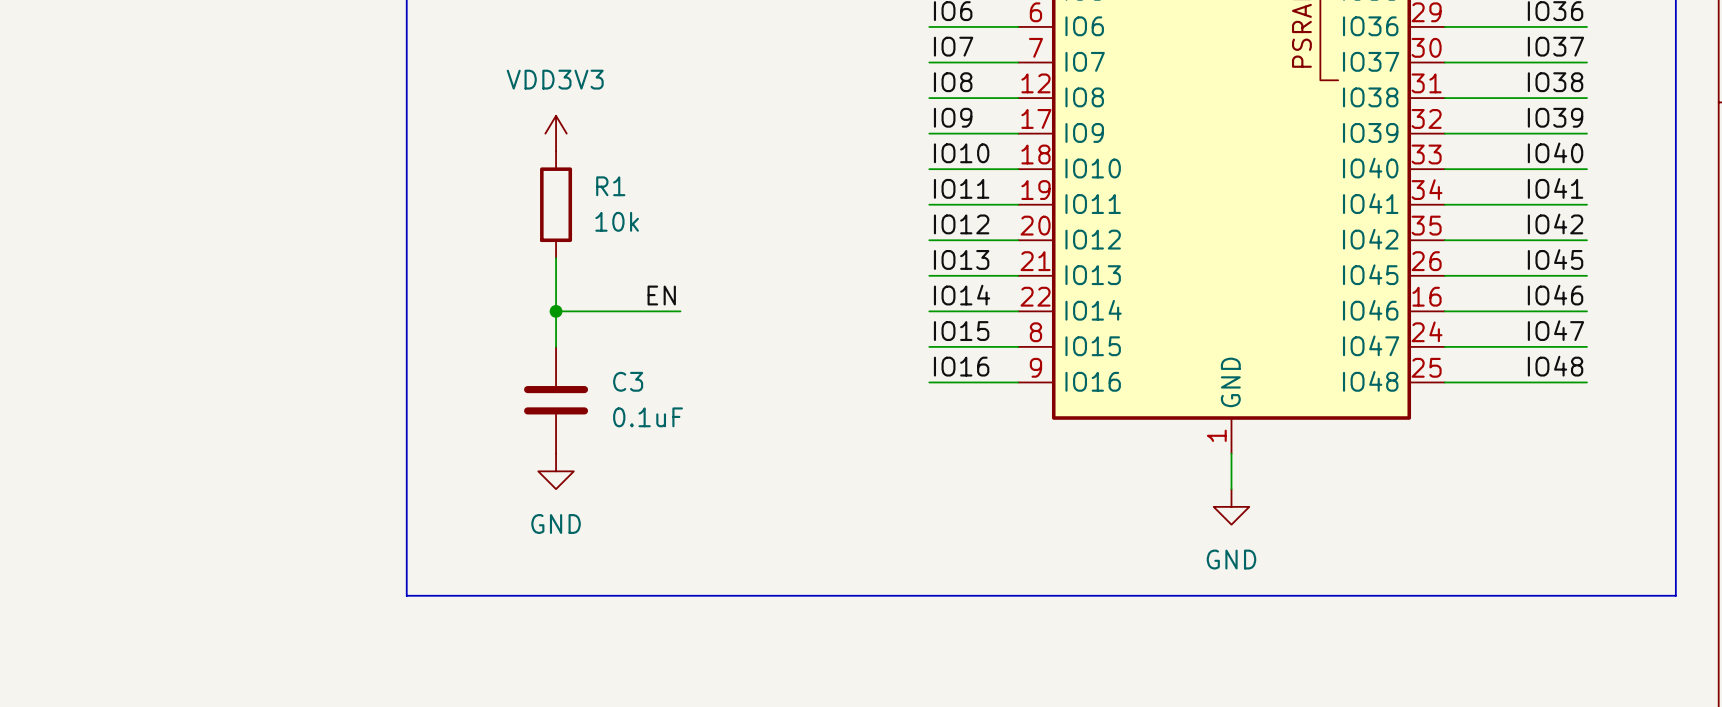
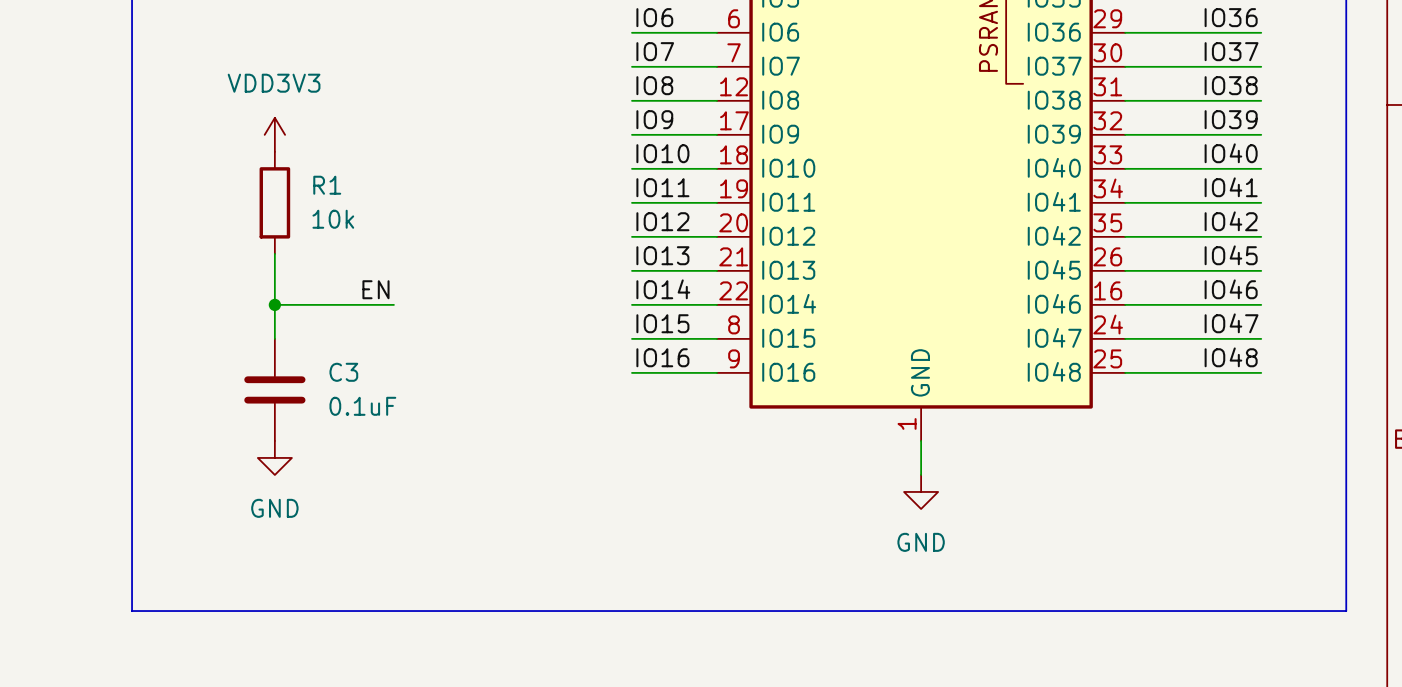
line: (406, 595) (1675, 595) -> (132, 577) (132, 611) (1346, 611) (1346, 577)

